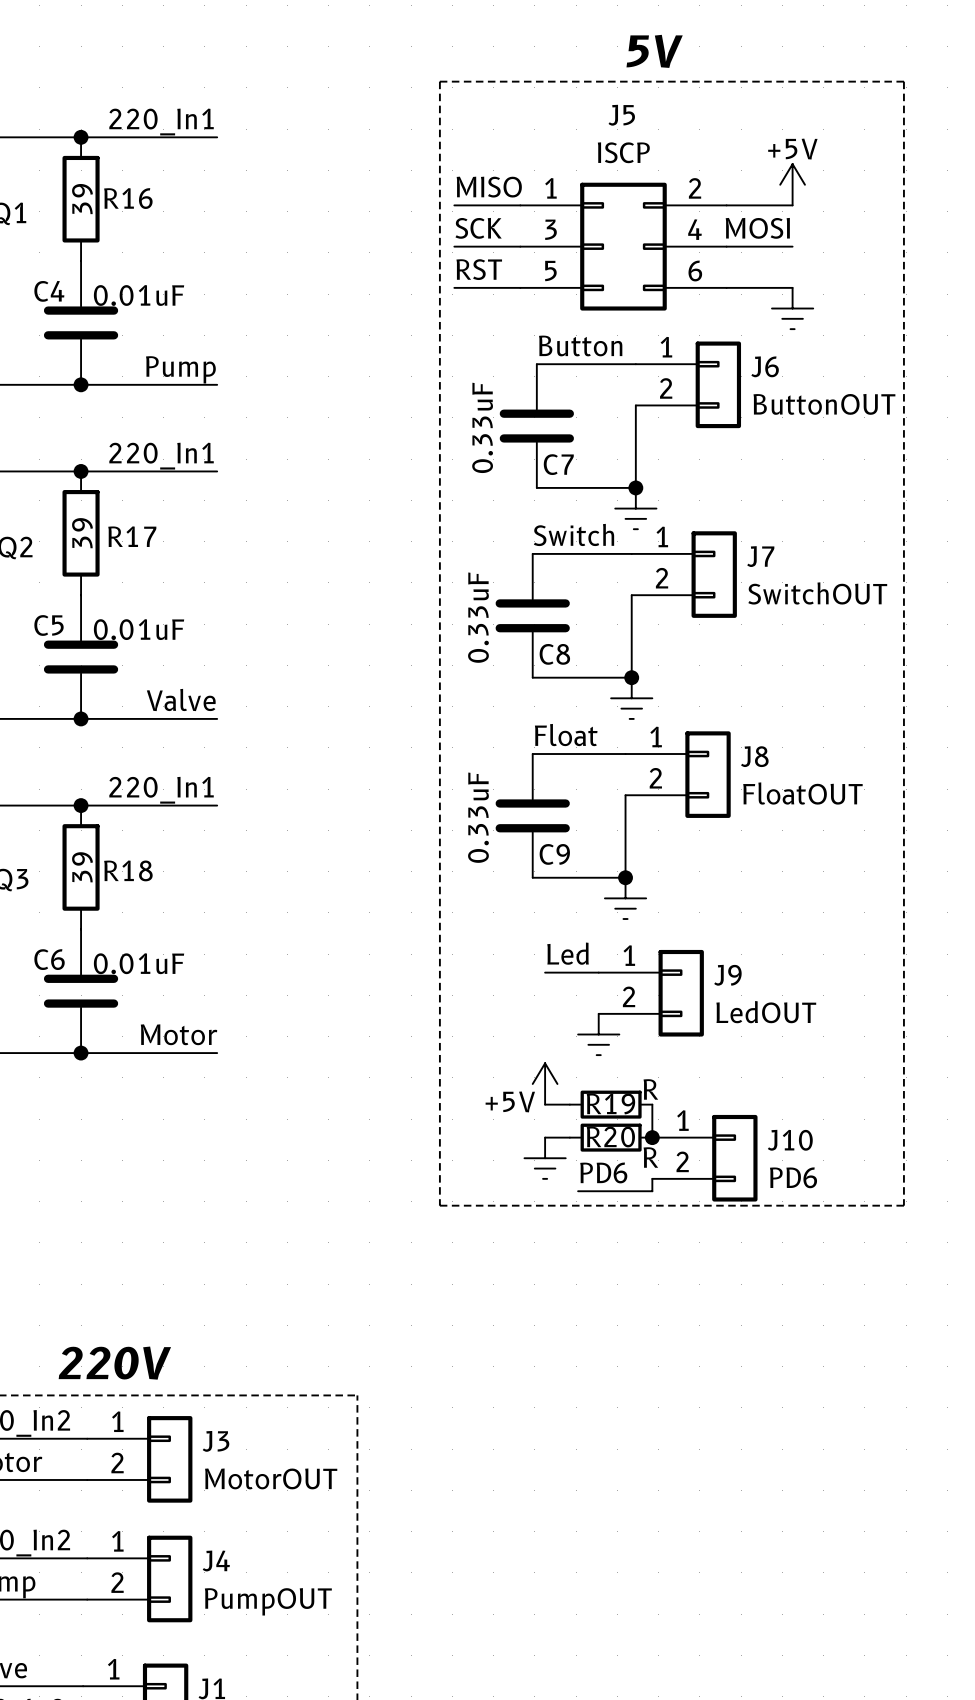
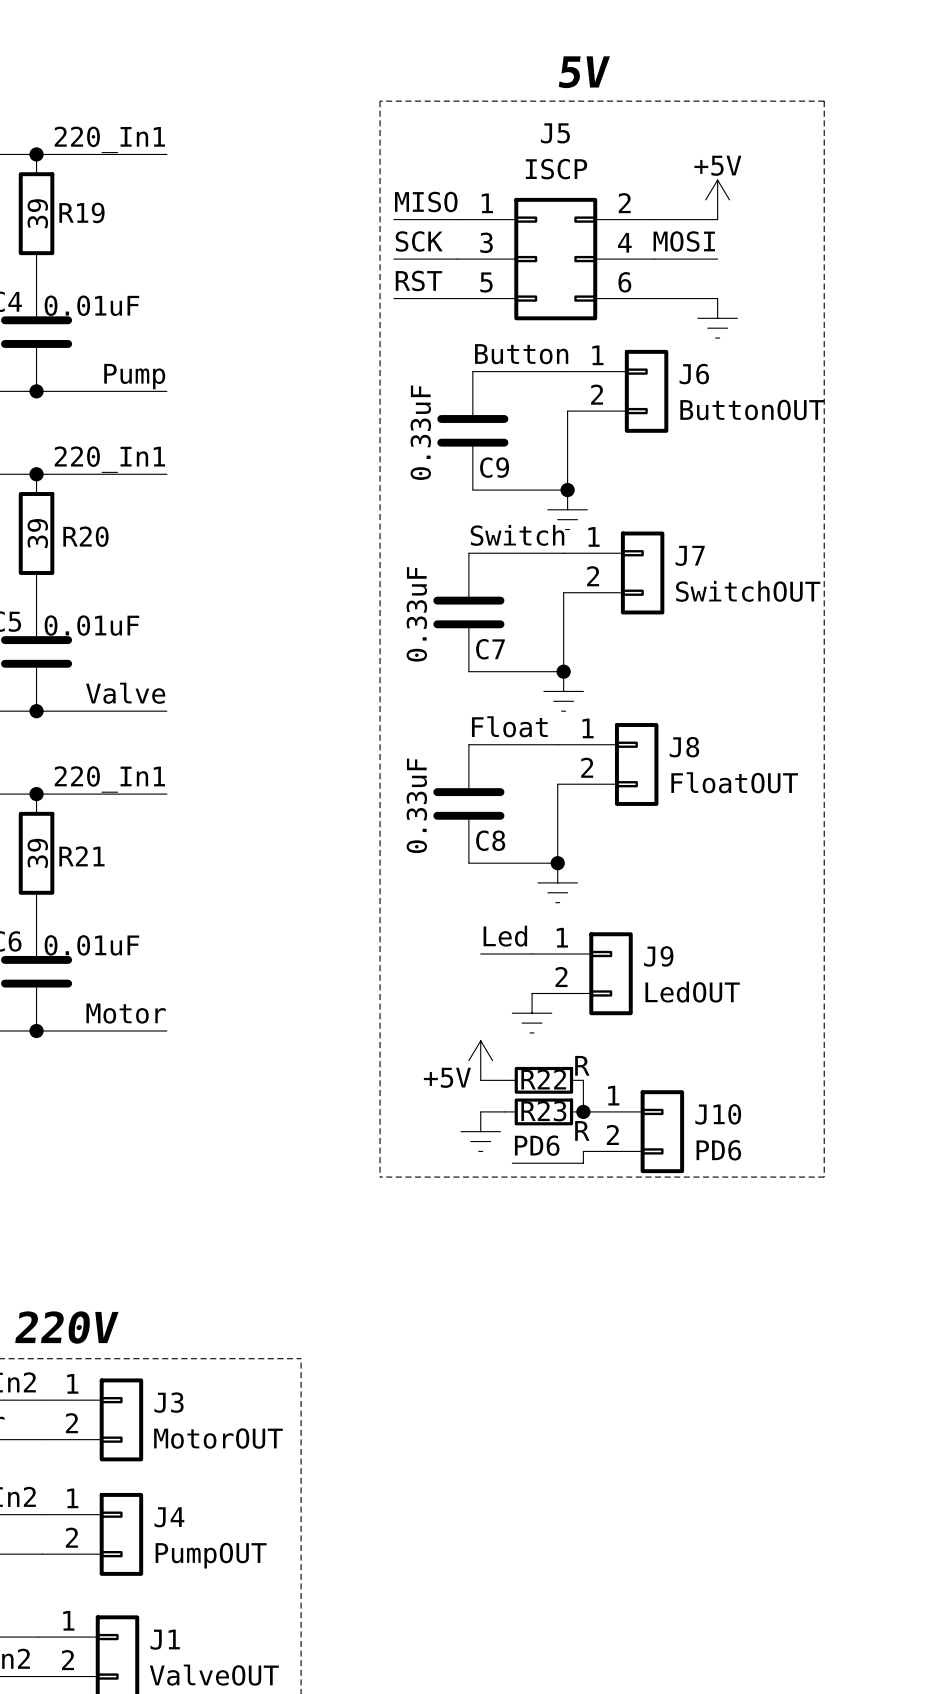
R16 name: R16 (128, 198) -> R19 (81, 212)
C7 name: C7 (558, 464) -> C9 (494, 467)
R17 name: R17 (132, 536) -> R20 (85, 536)
C8 name: C8 (554, 654) -> C7 (490, 649)
C9 name: C9 (554, 854) -> C8 (490, 840)
R18 name: R18 (128, 870) -> R21 (81, 856)
R19 name: R19 (610, 1103) -> R22 (543, 1079)
R20 name: R20 (610, 1136) -> R23 (543, 1111)

